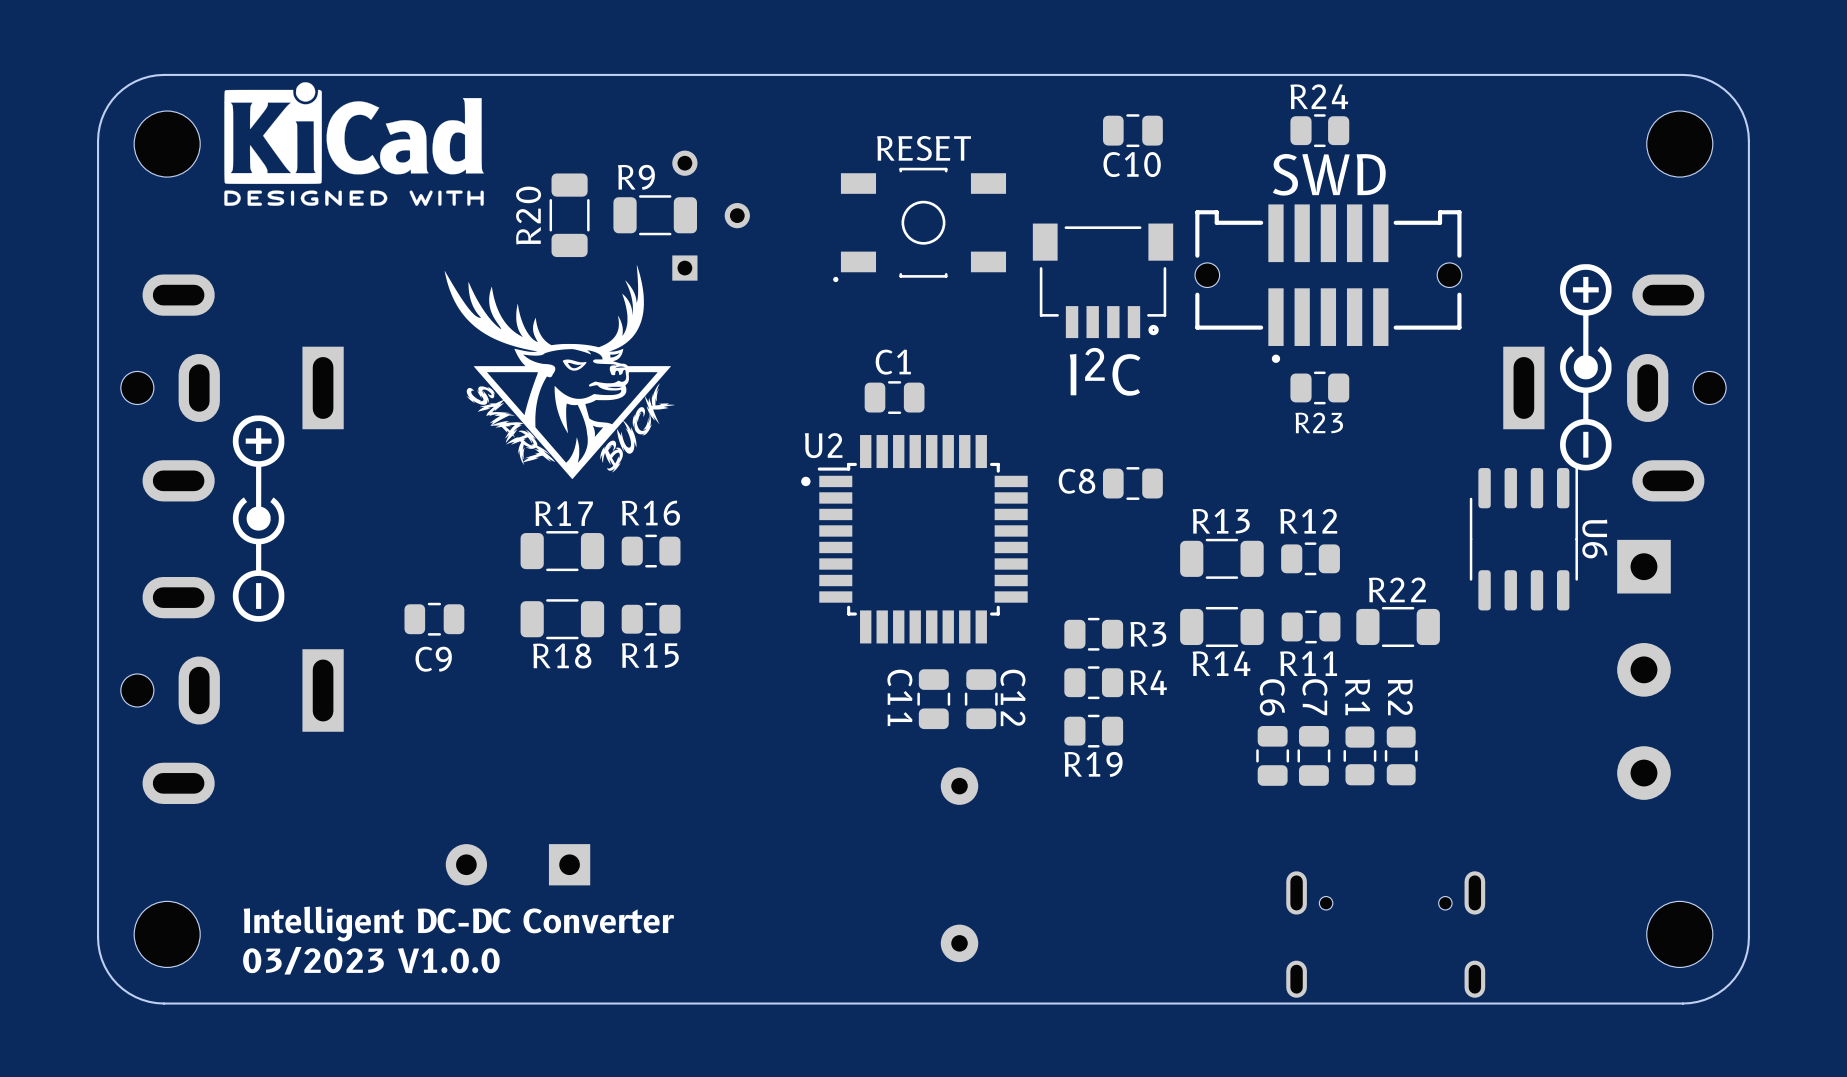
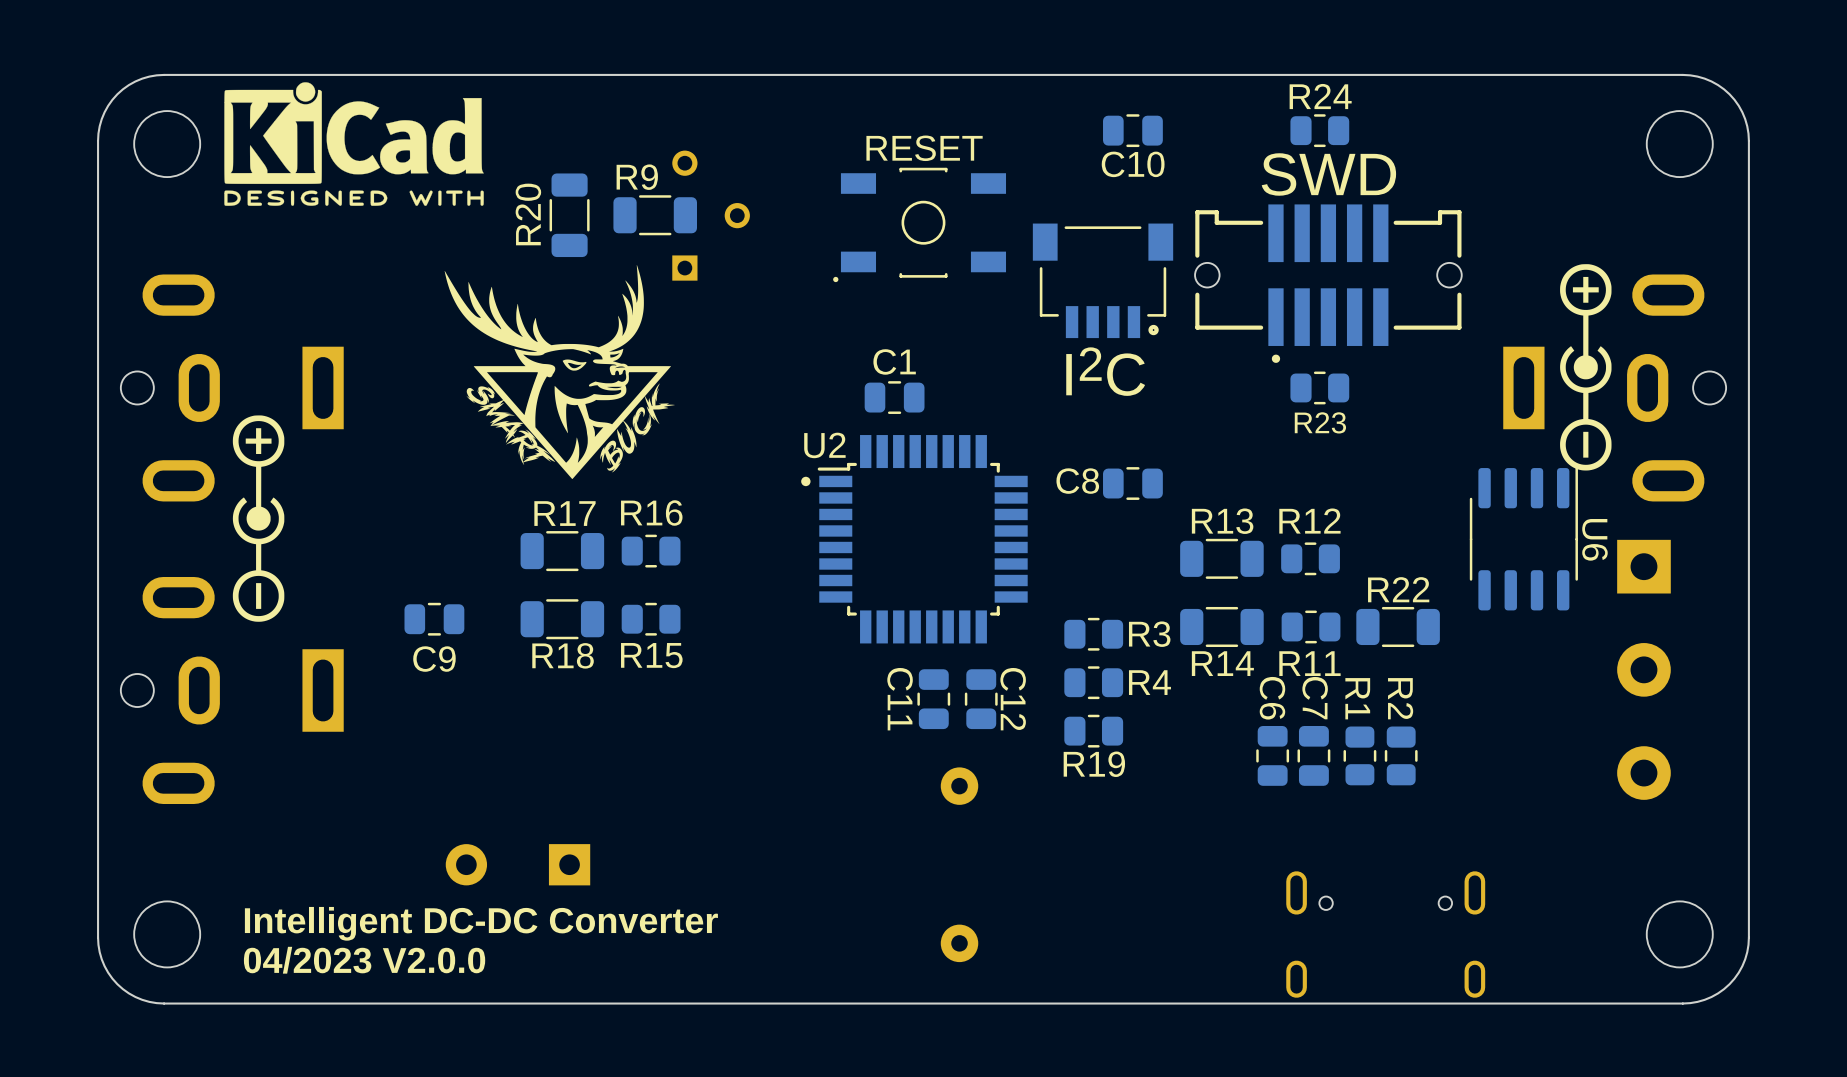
text: 03/2023 V1.0.0 (371, 960) -> 04/2023 V2.0.0 (364, 960)

